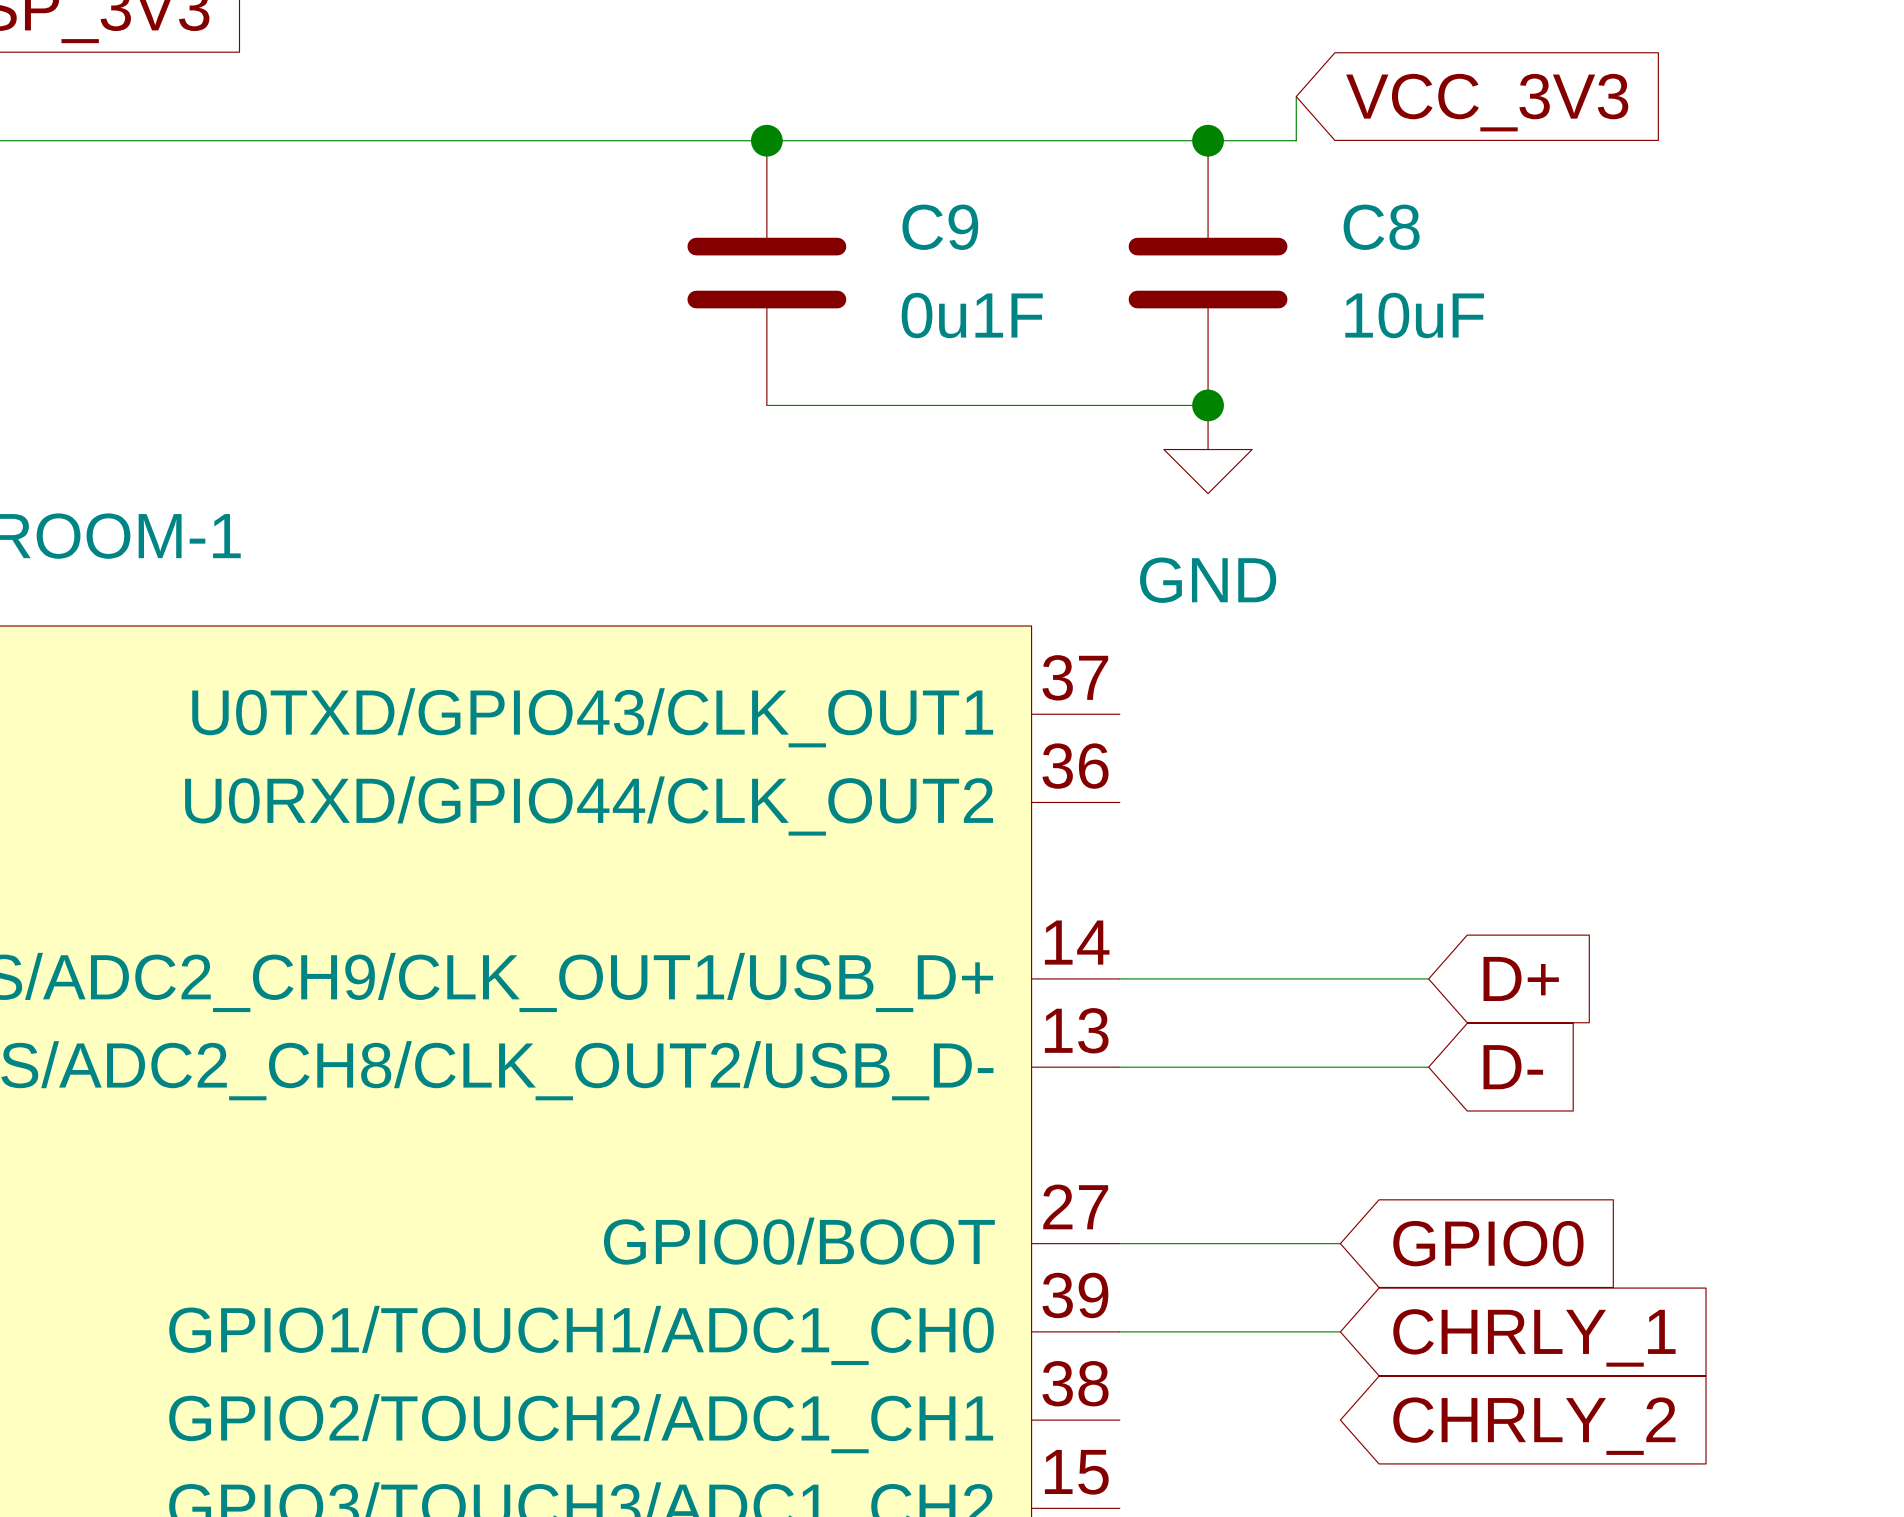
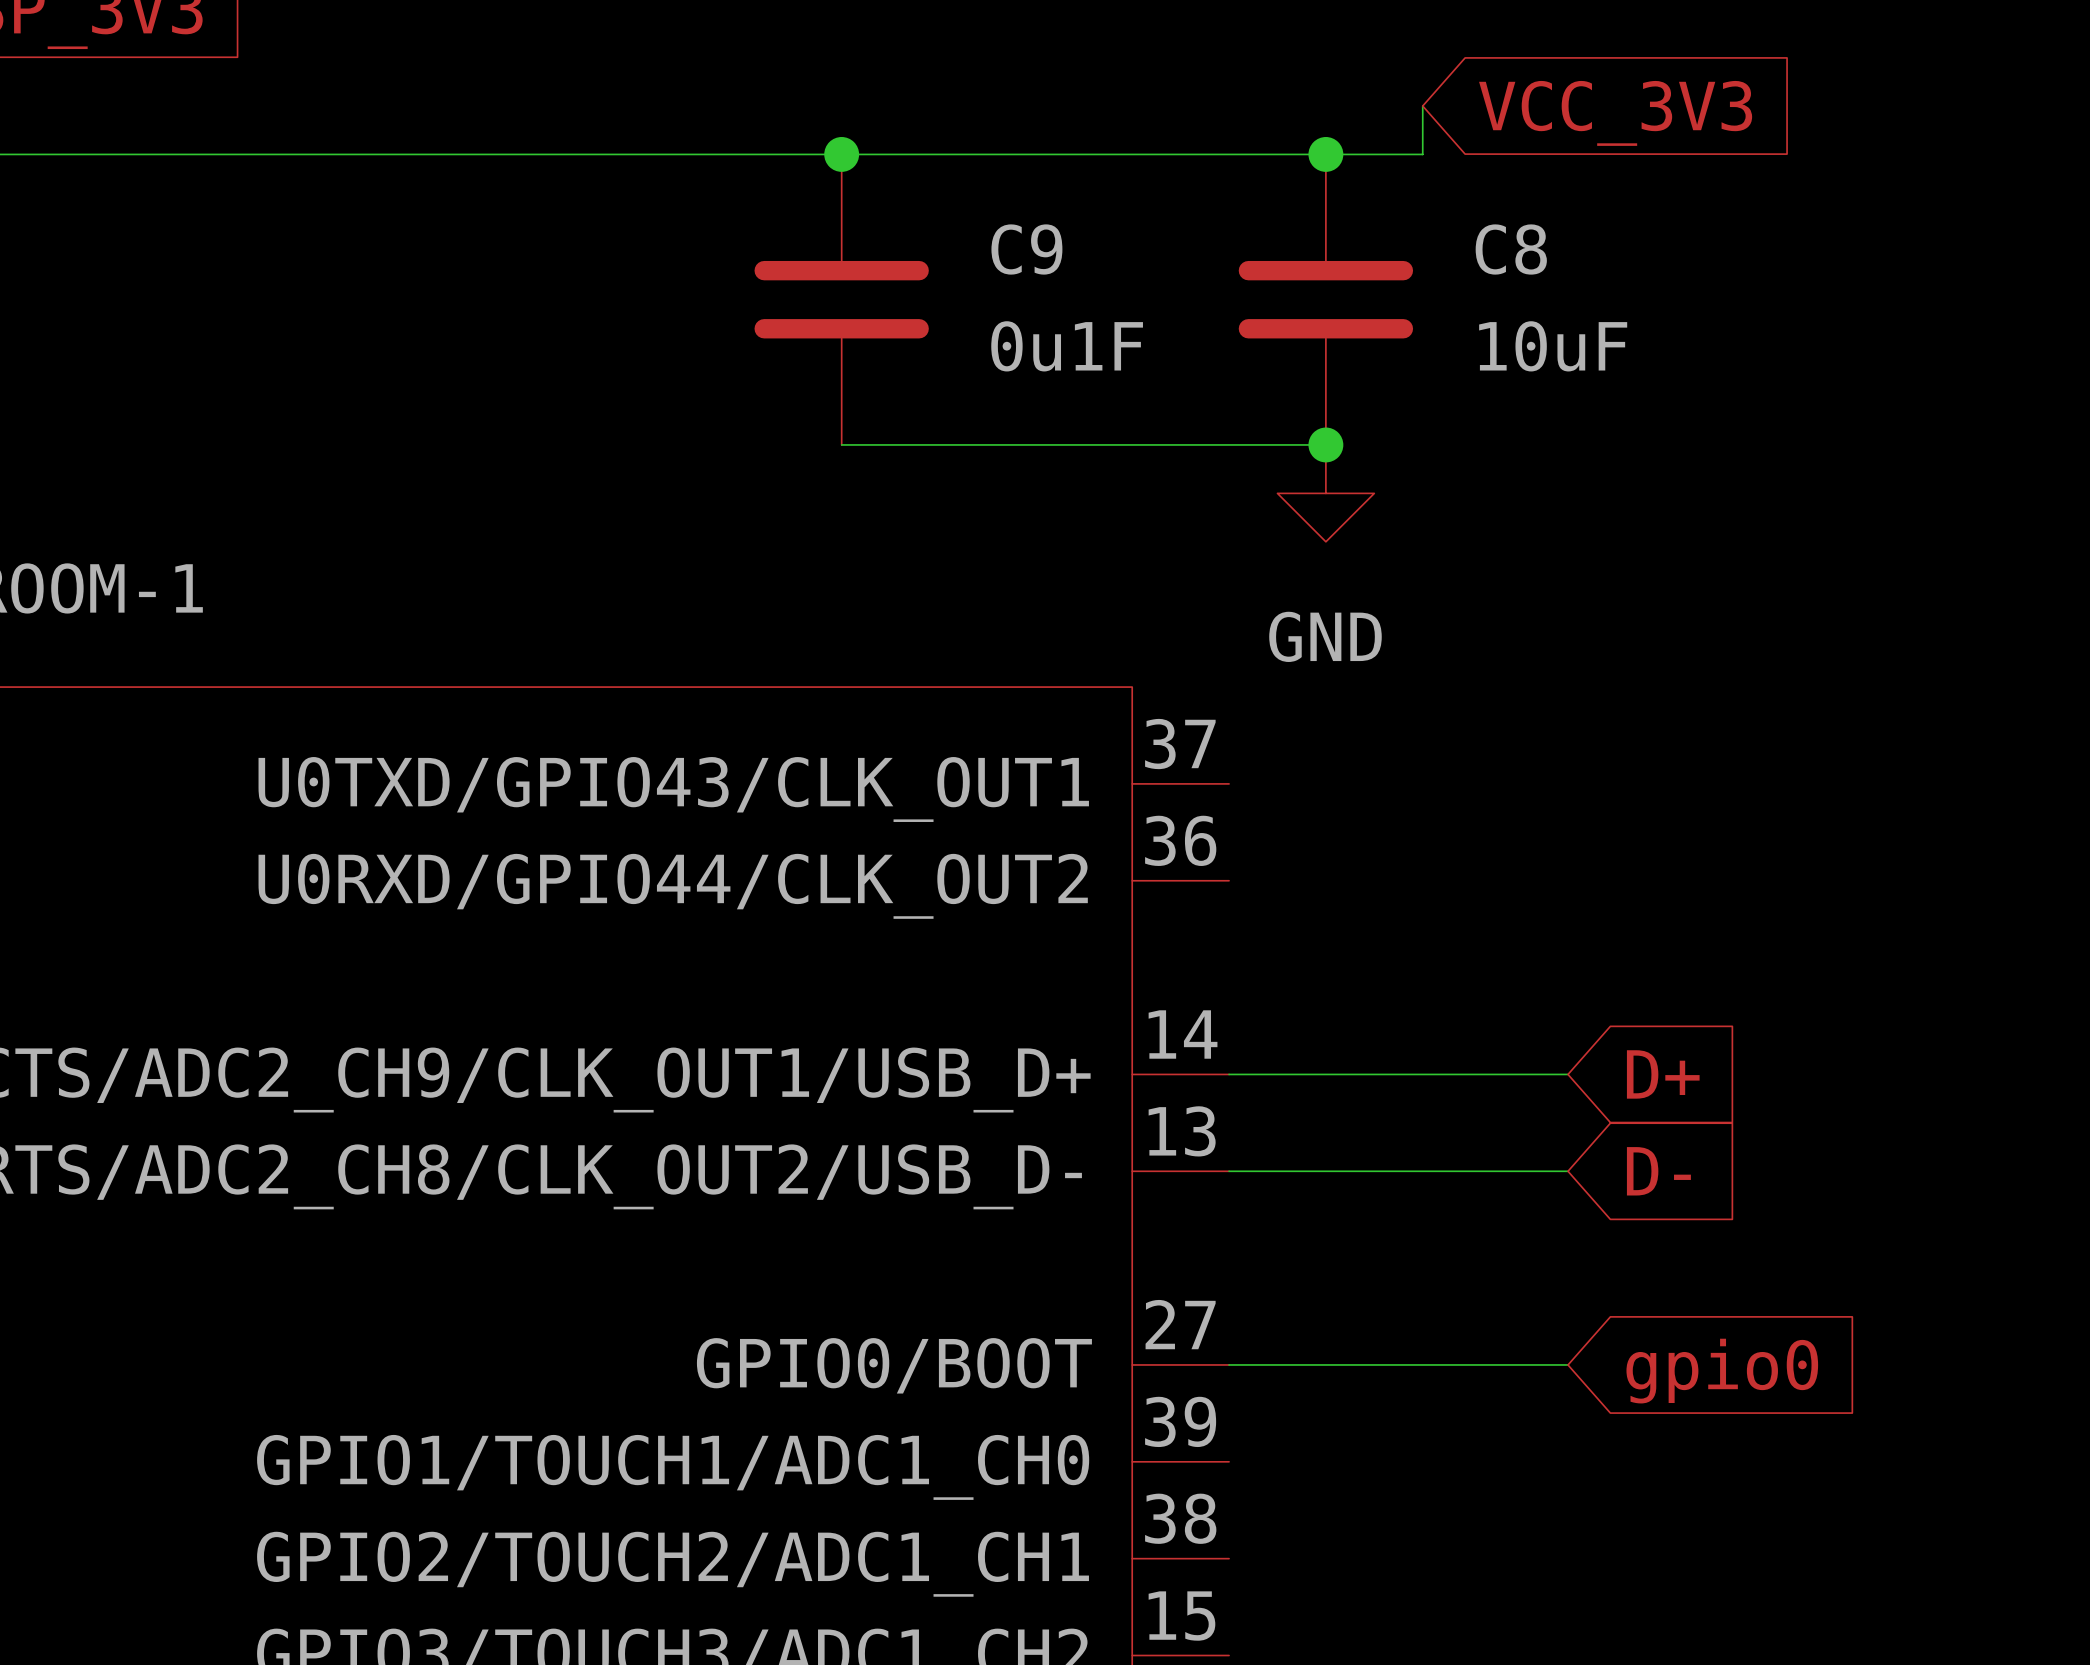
wire: none -> (1471, 1364) (1568, 1364)
global label: GPIO0 (1488, 1243) -> none
global label: none -> gpio0 (1722, 1371)
wire: (1119, 1331) (1340, 1331) -> none
global label: CHRLY_1 (1534, 1337) -> none
global label: CHRLY_2 (1534, 1426) -> none

